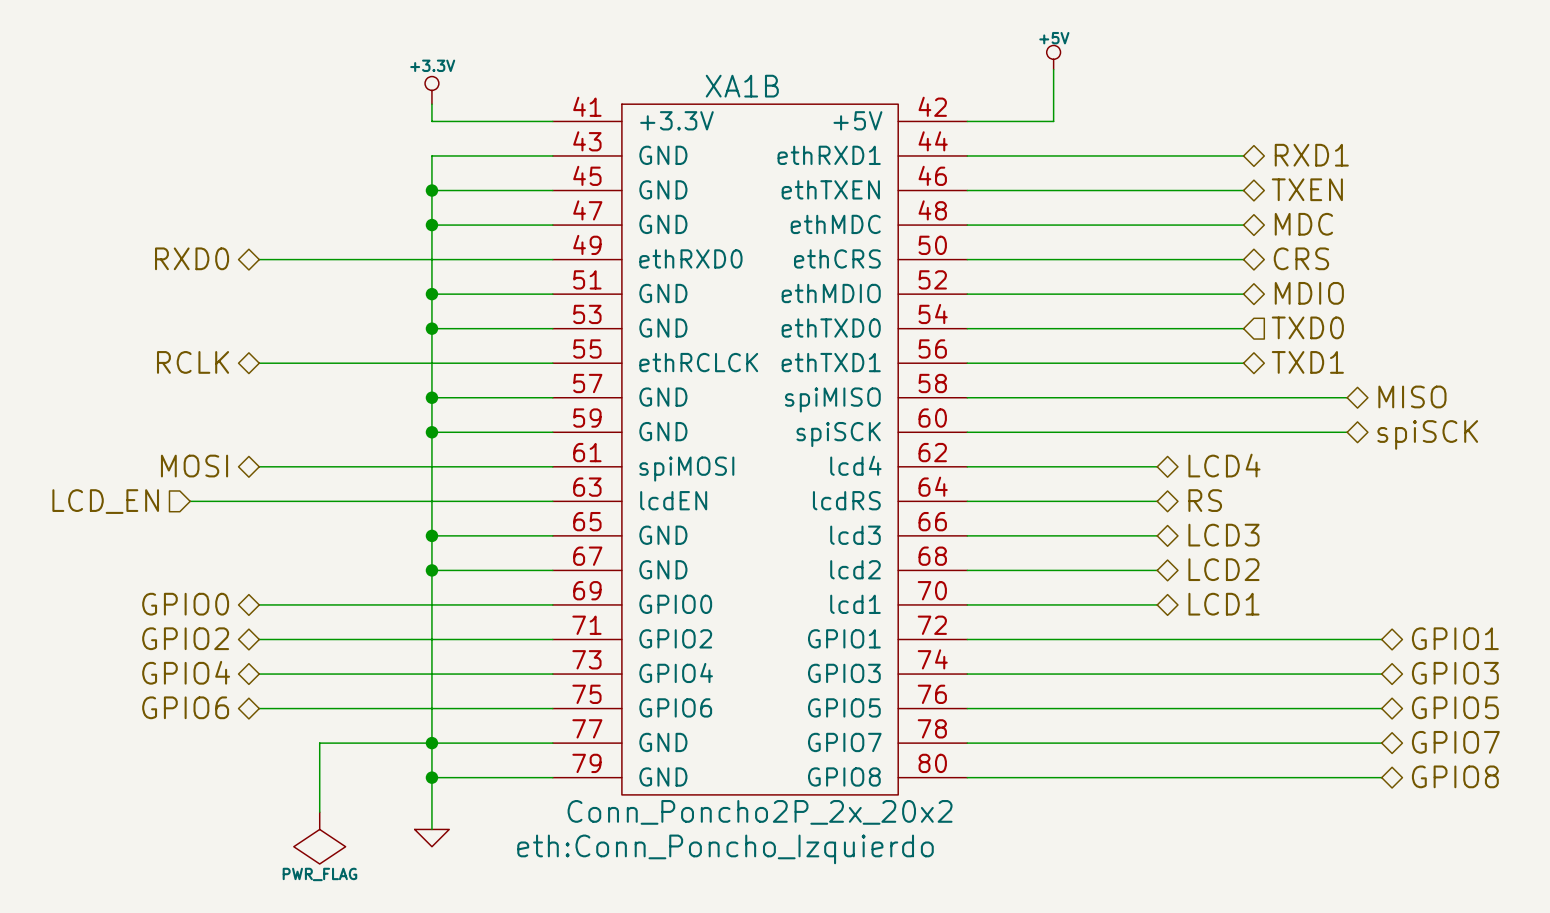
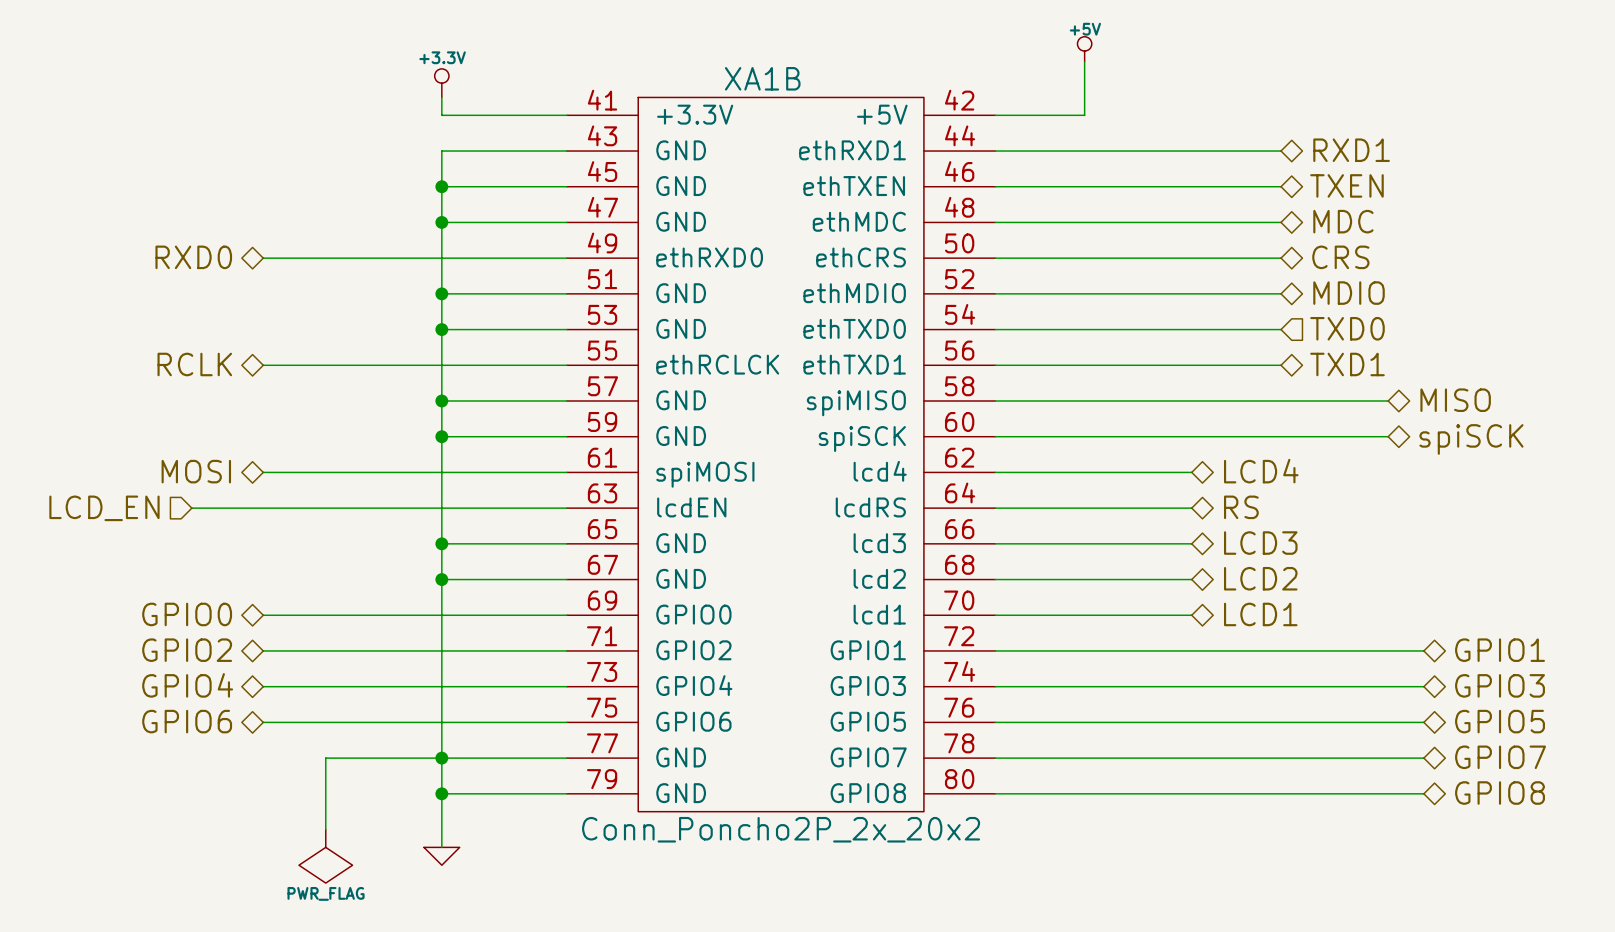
XA1B text: eth:Conn_Poncho_Izquierdo (725, 849) -> none

